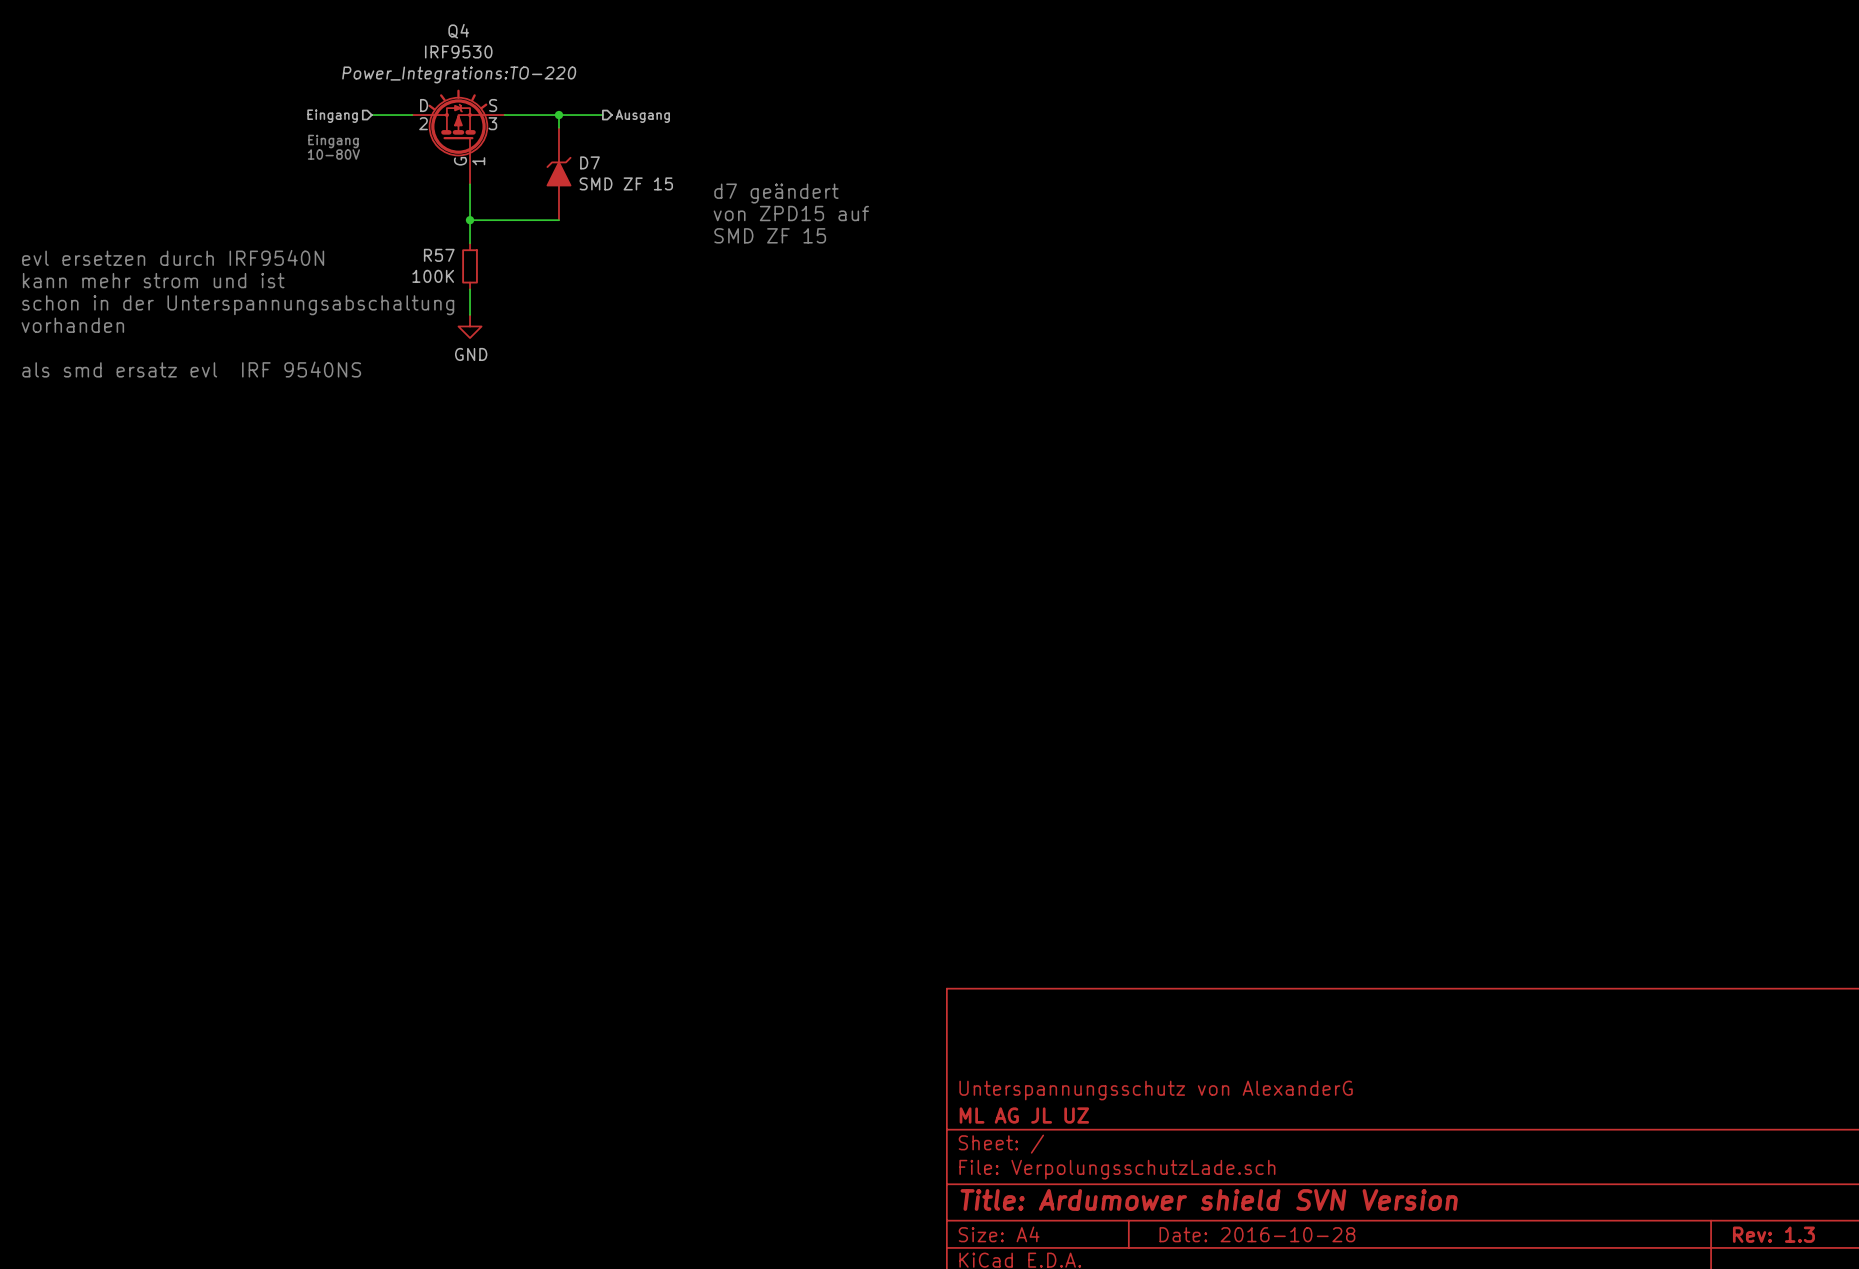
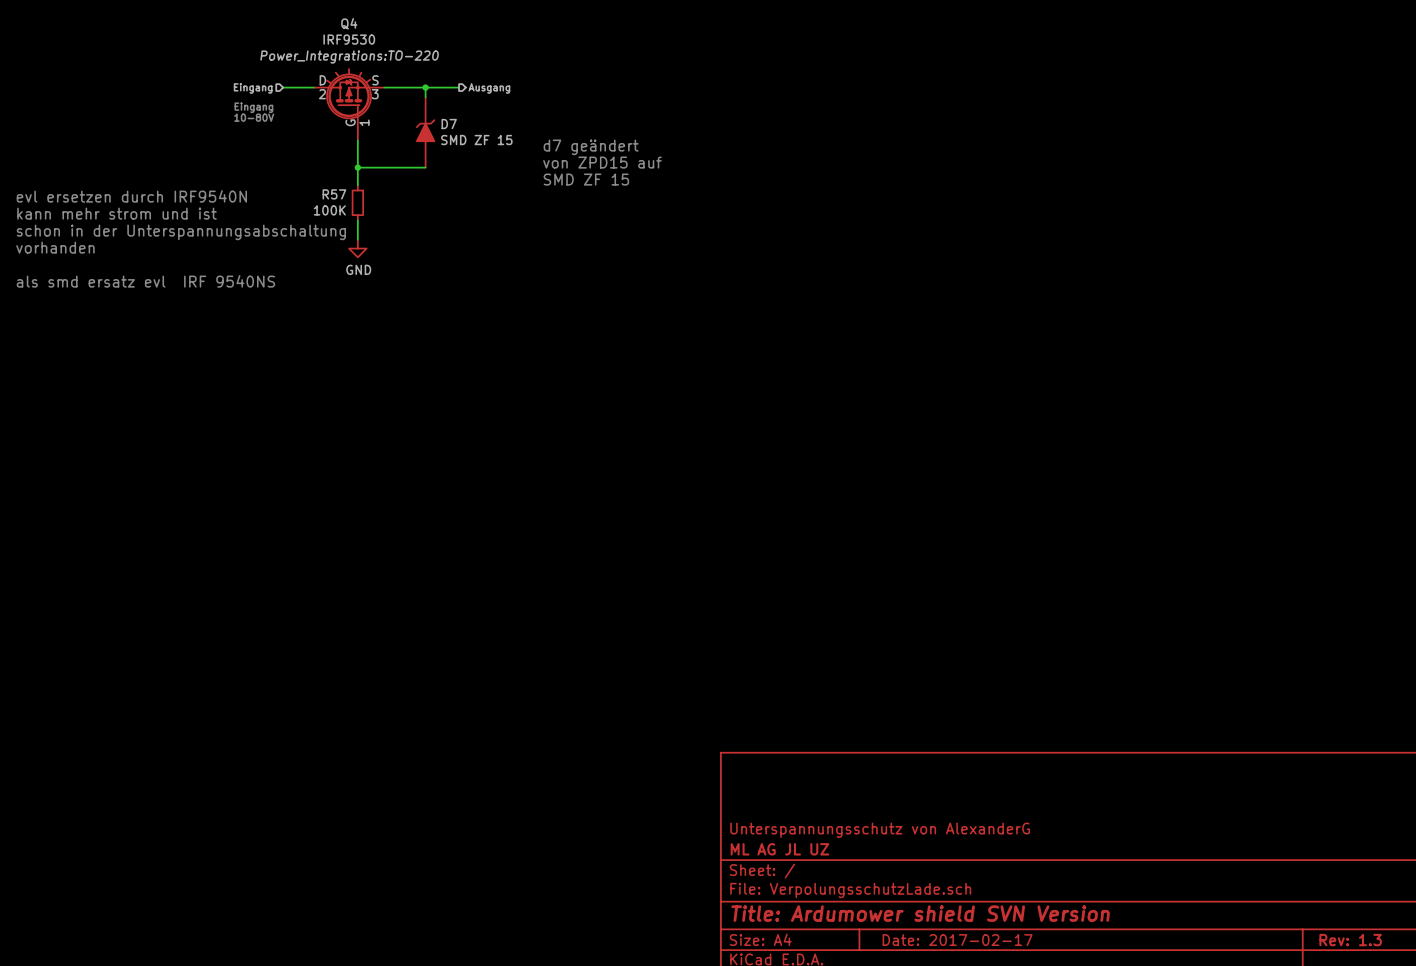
title block: Date: 2016-10-28 (1257, 1234) -> Date: 2017-02-17 (957, 940)

